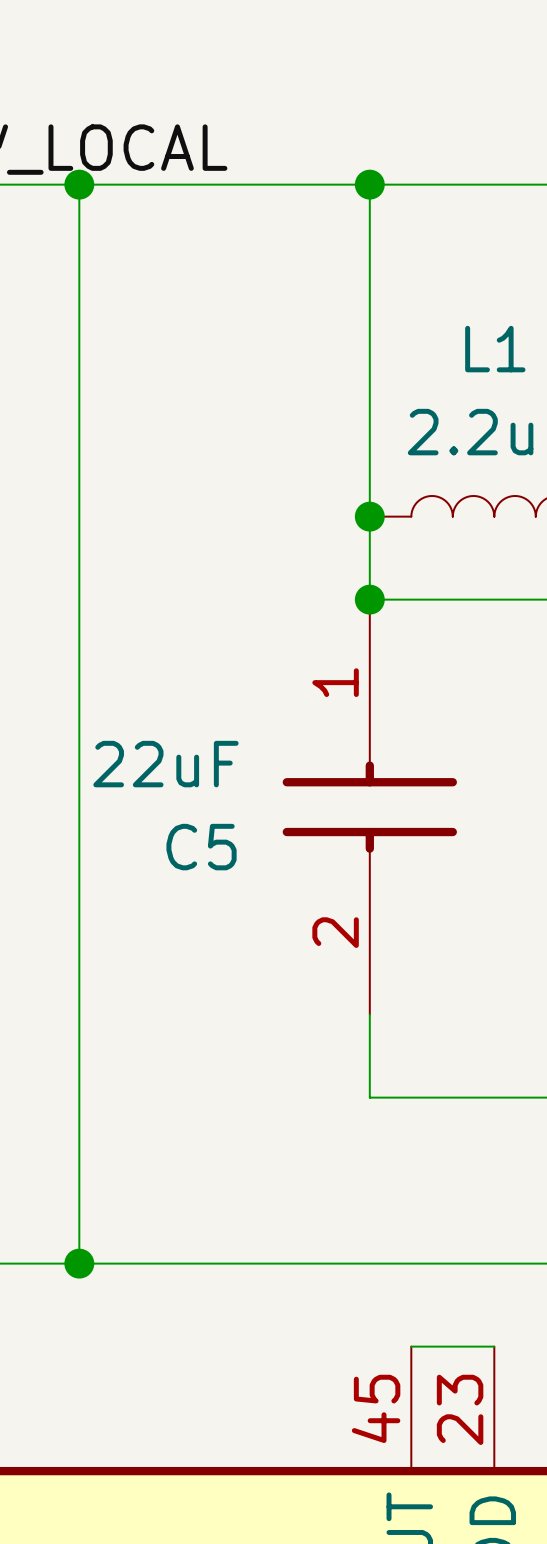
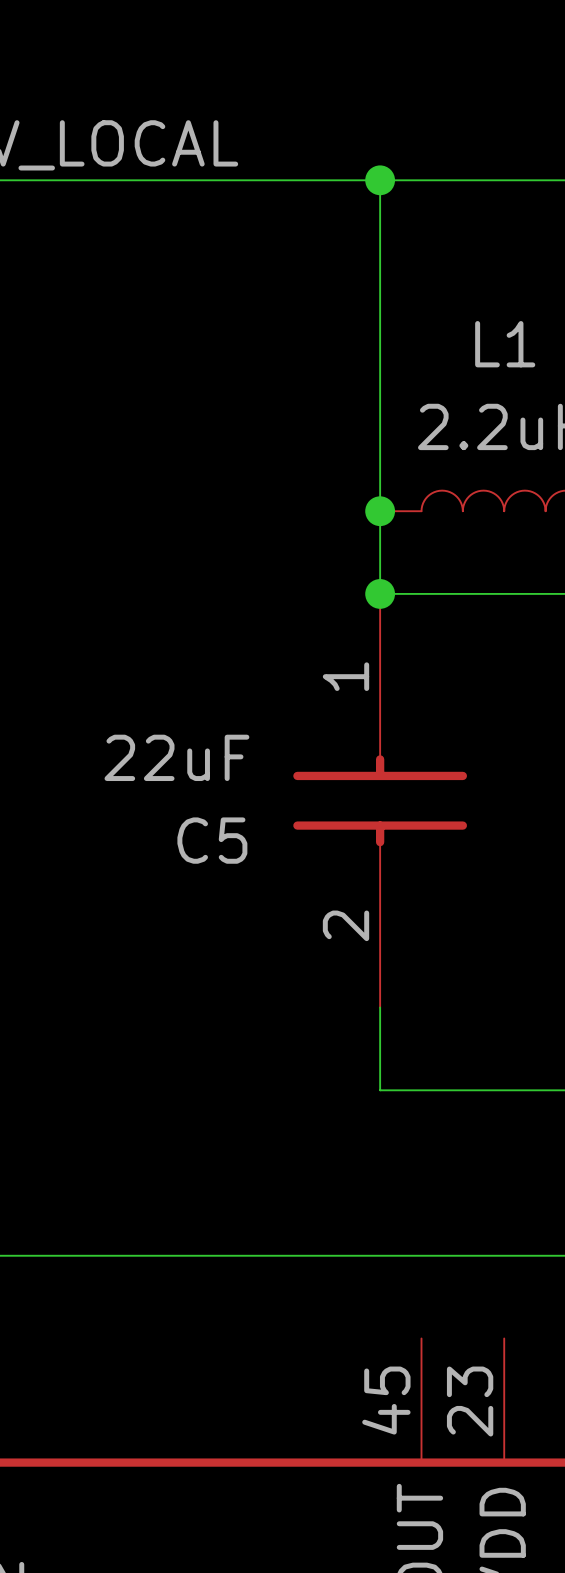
wire: (79, 184) (79, 1263) -> none
junction: (79, 184) -> none
junction: (79, 1263) -> none
wire: (411, 1346) (494, 1346) -> none

